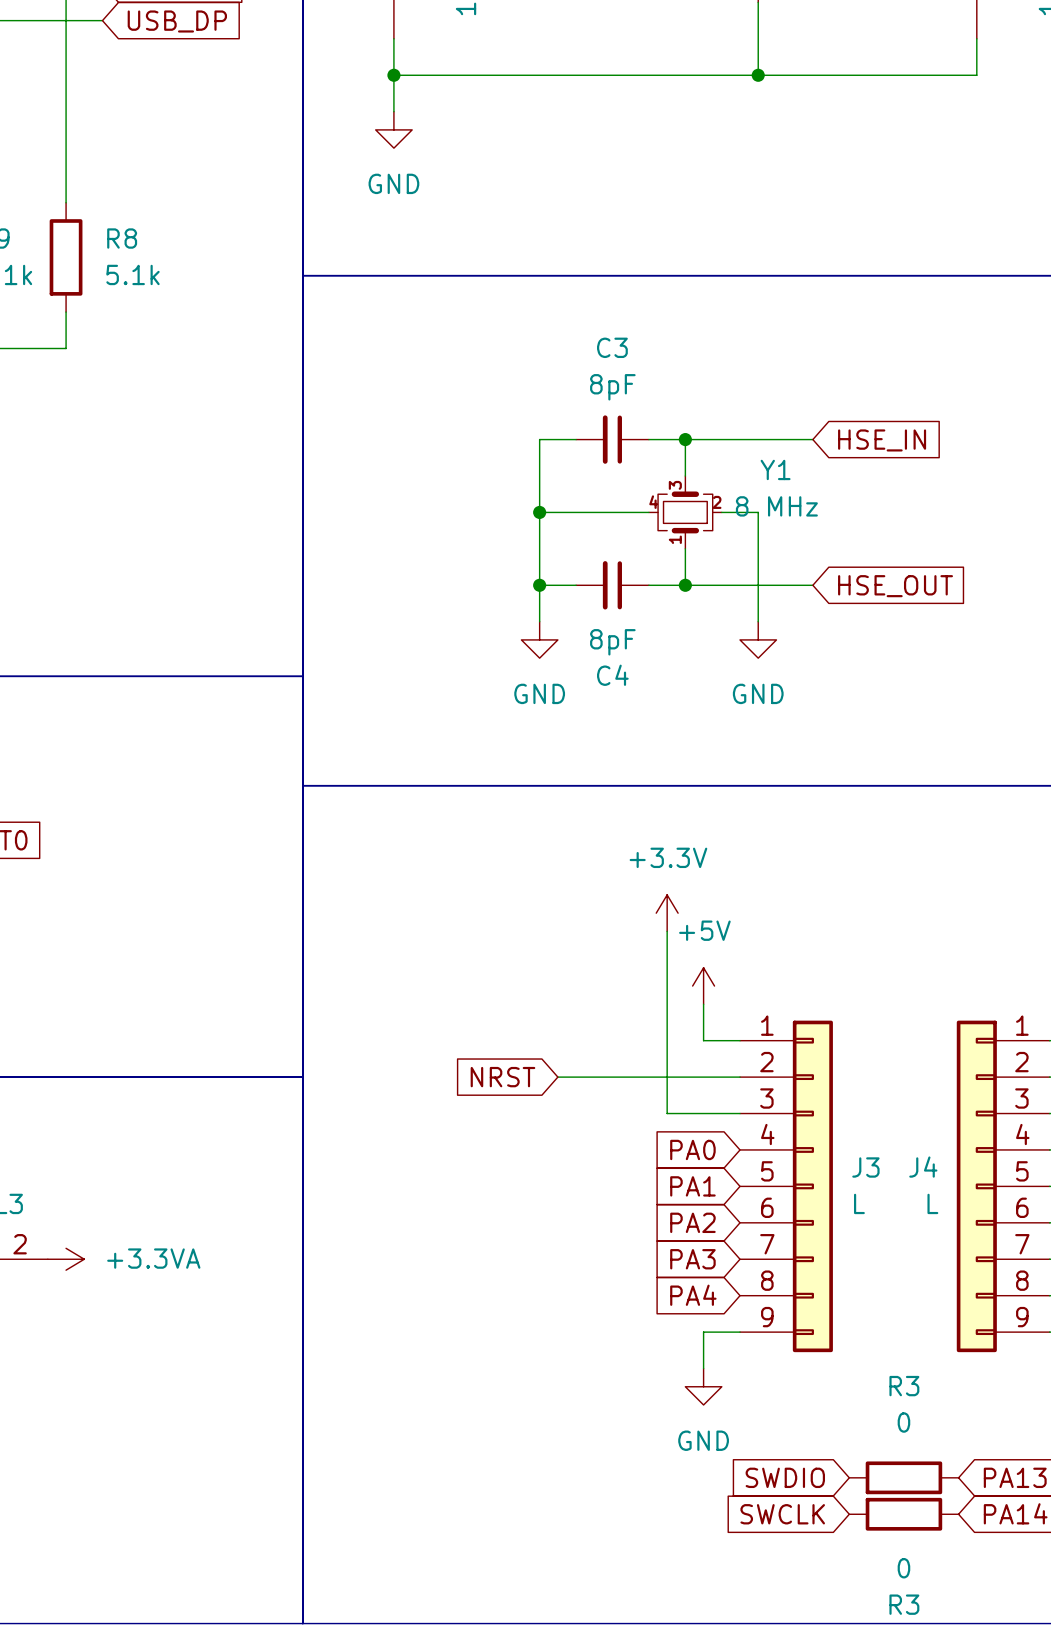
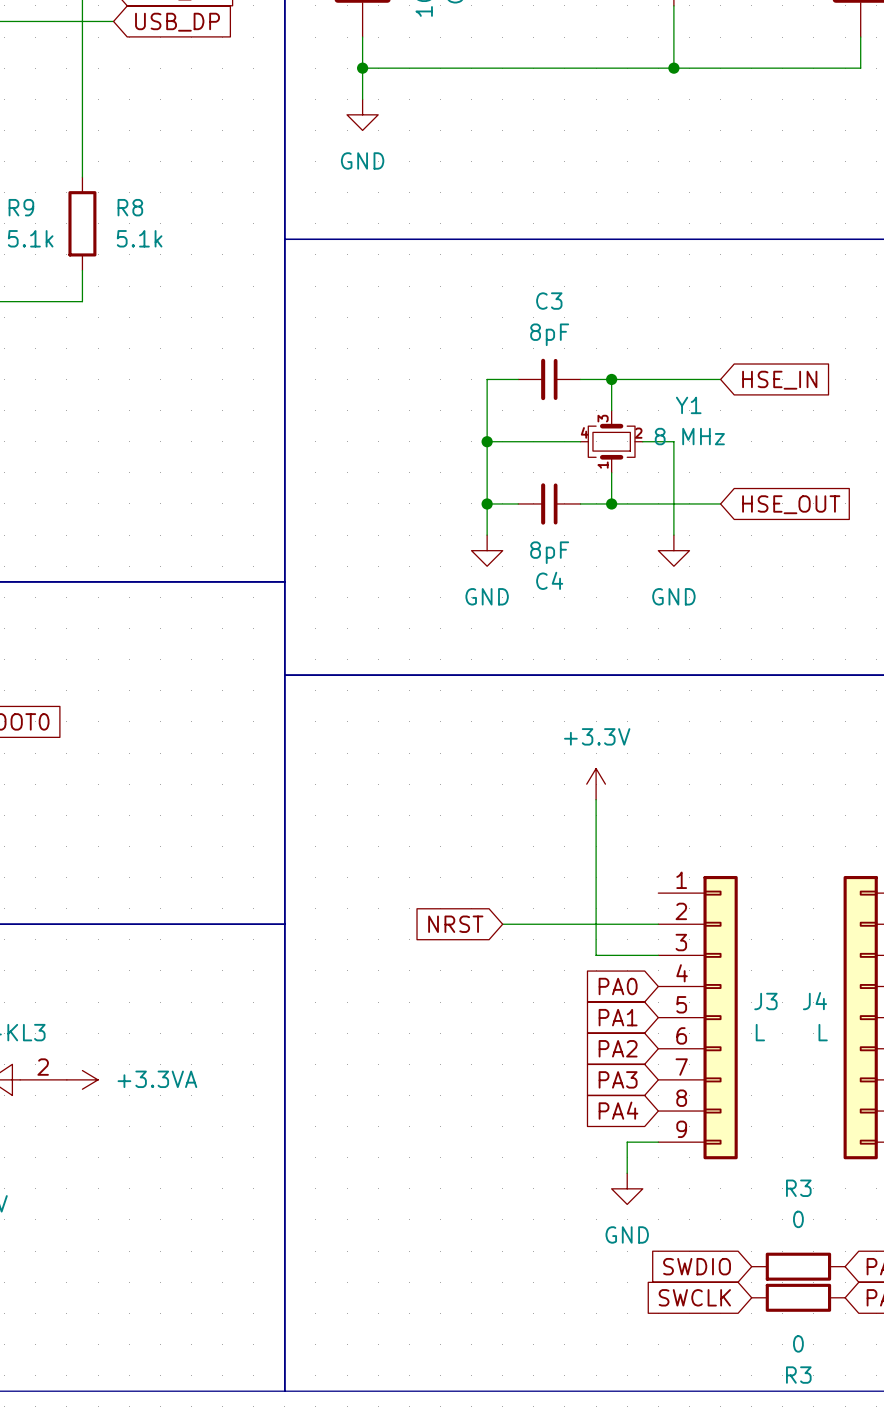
power symbol: +5V (703, 986) -> none
wire: (703, 1004) (703, 1040) (740, 1040) -> none

